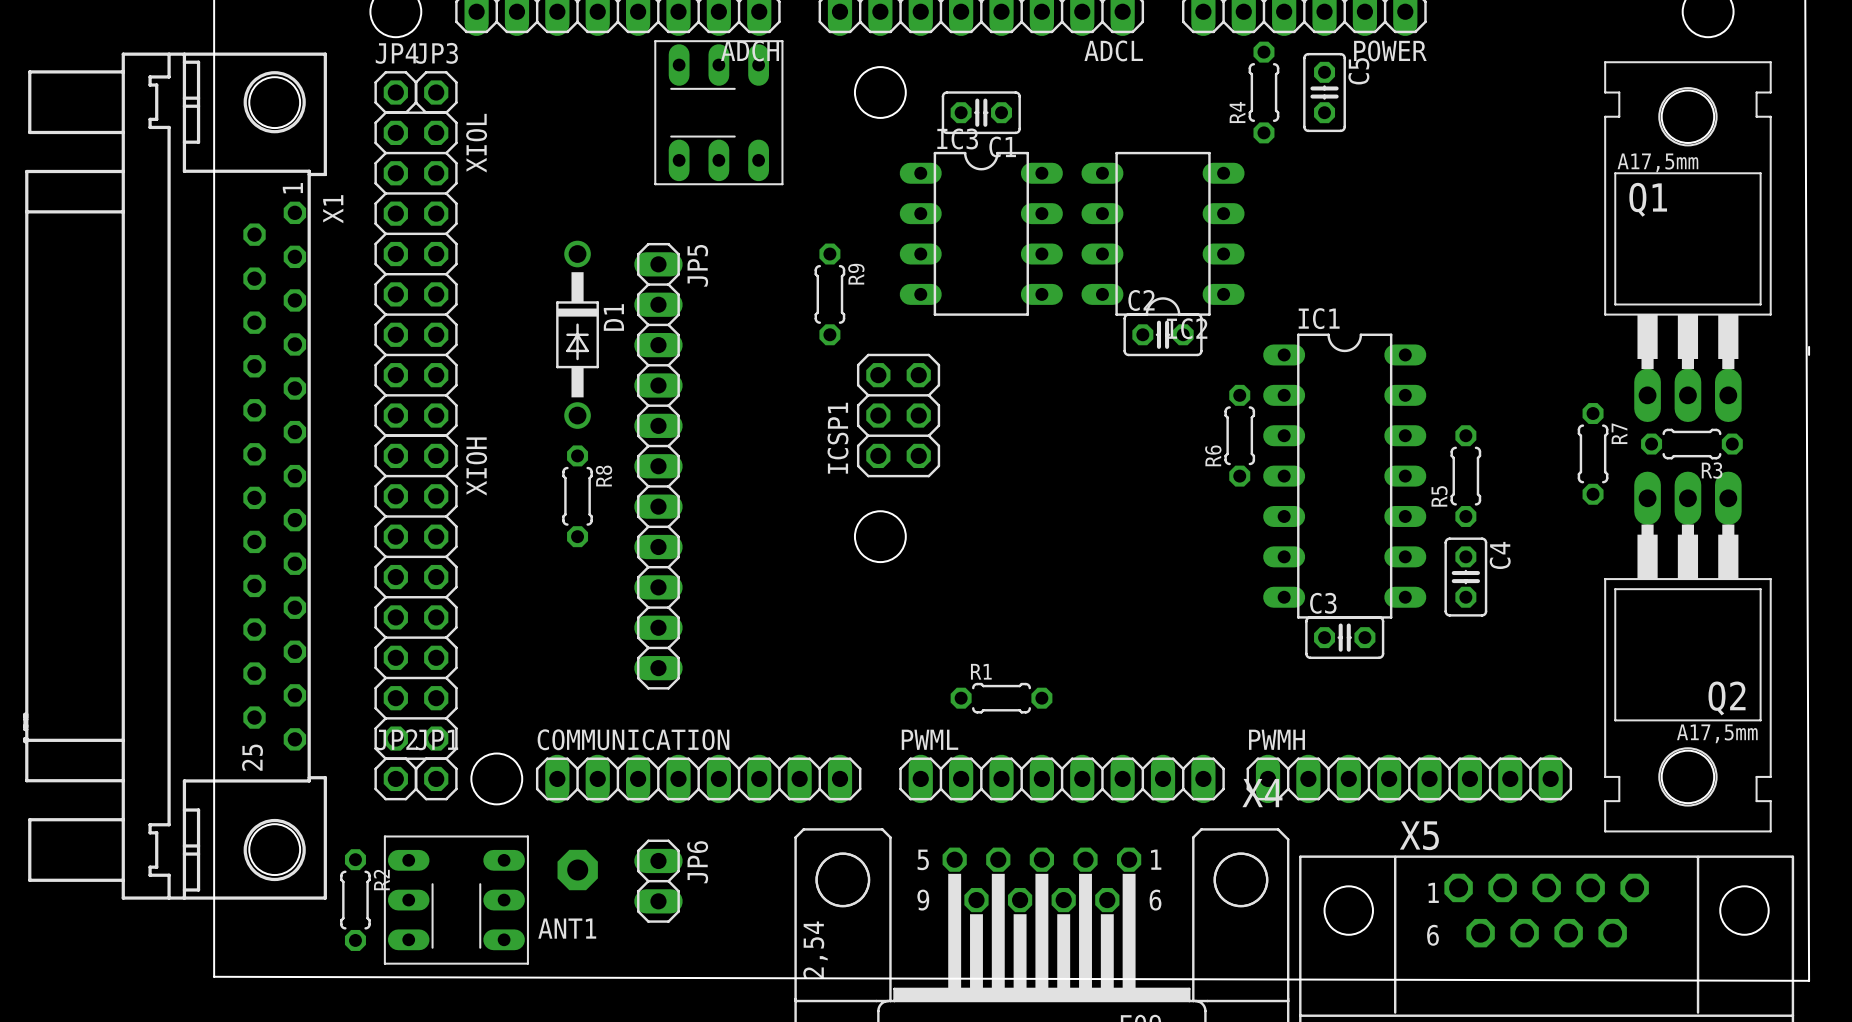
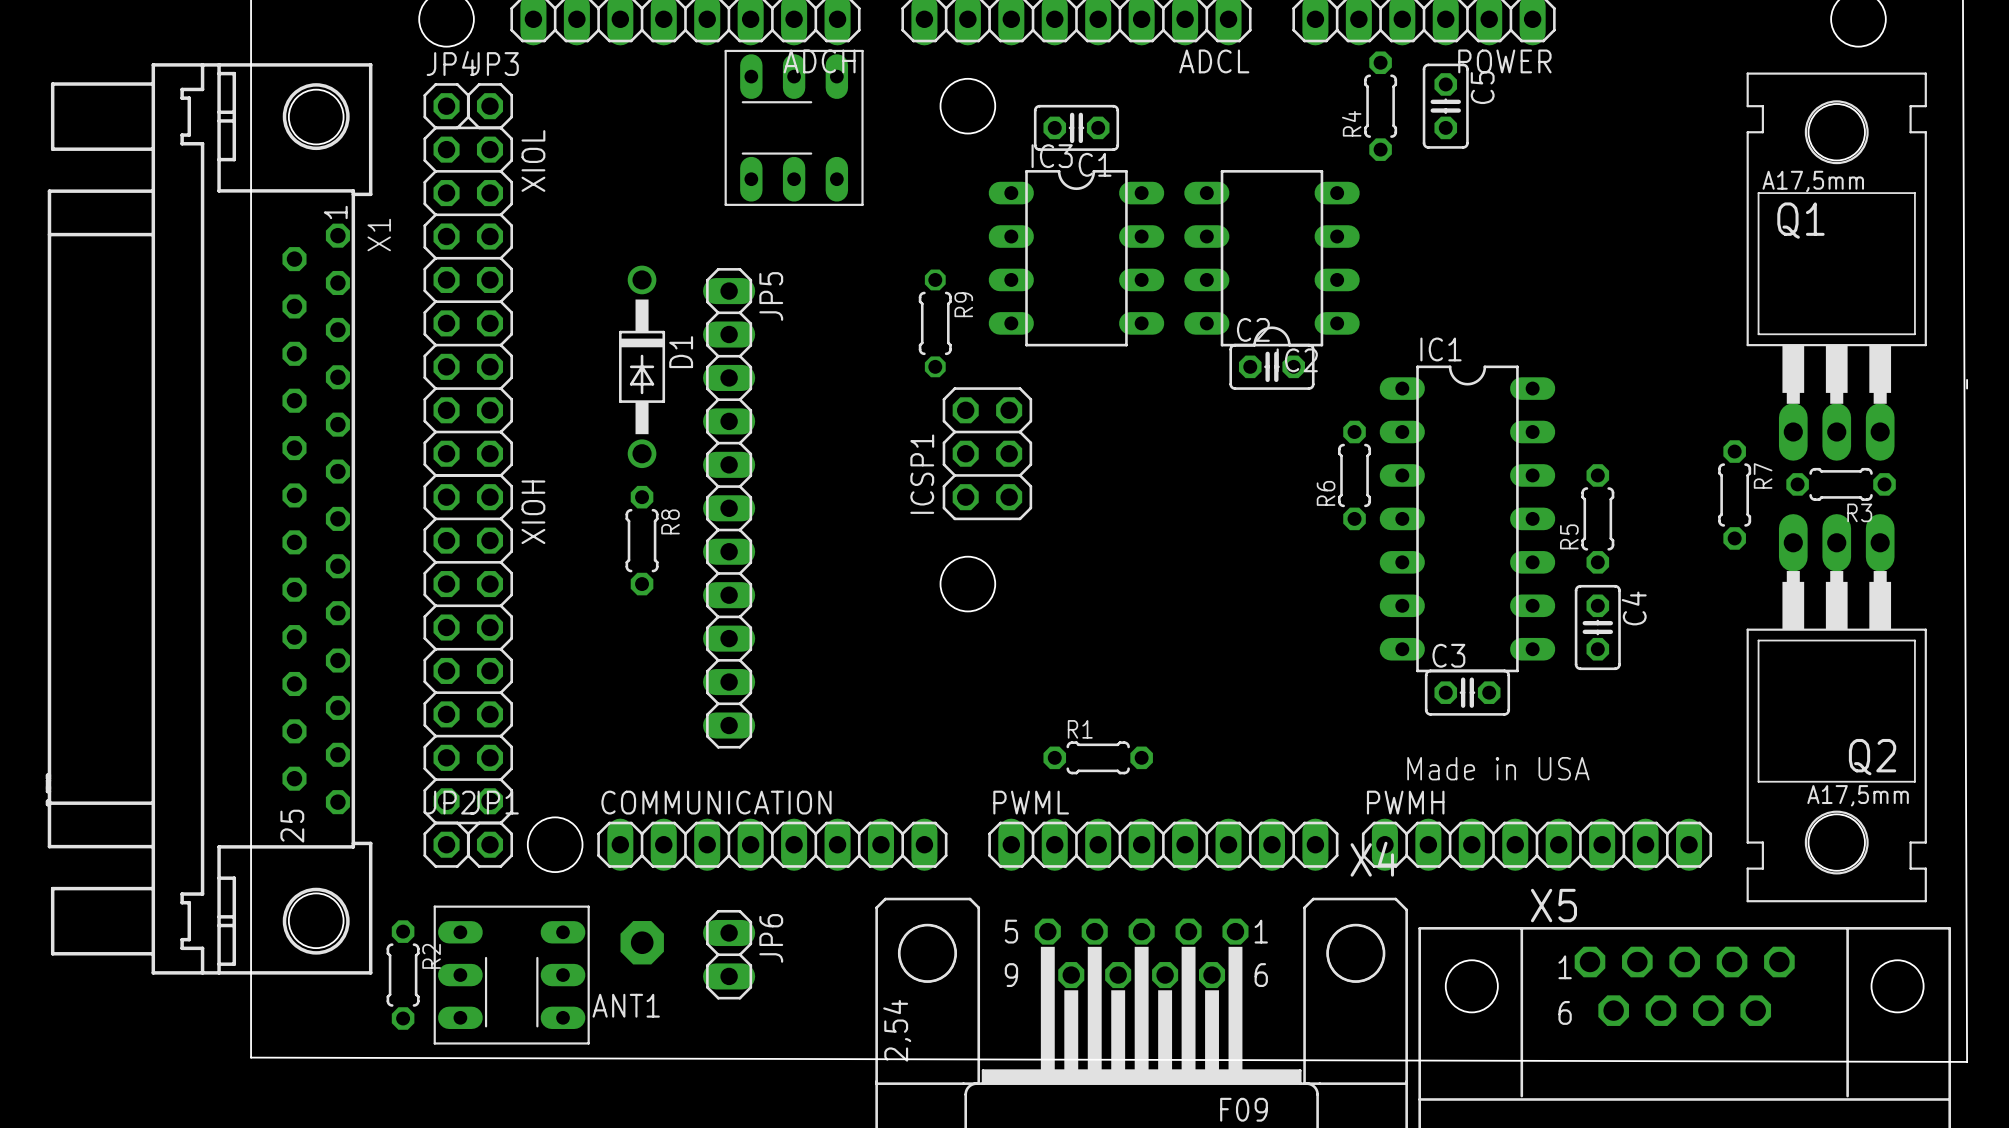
R9 footprint: [814, 243, 846, 346] -> [918, 269, 952, 378]
text: none -> Made in USA (1498, 768)

